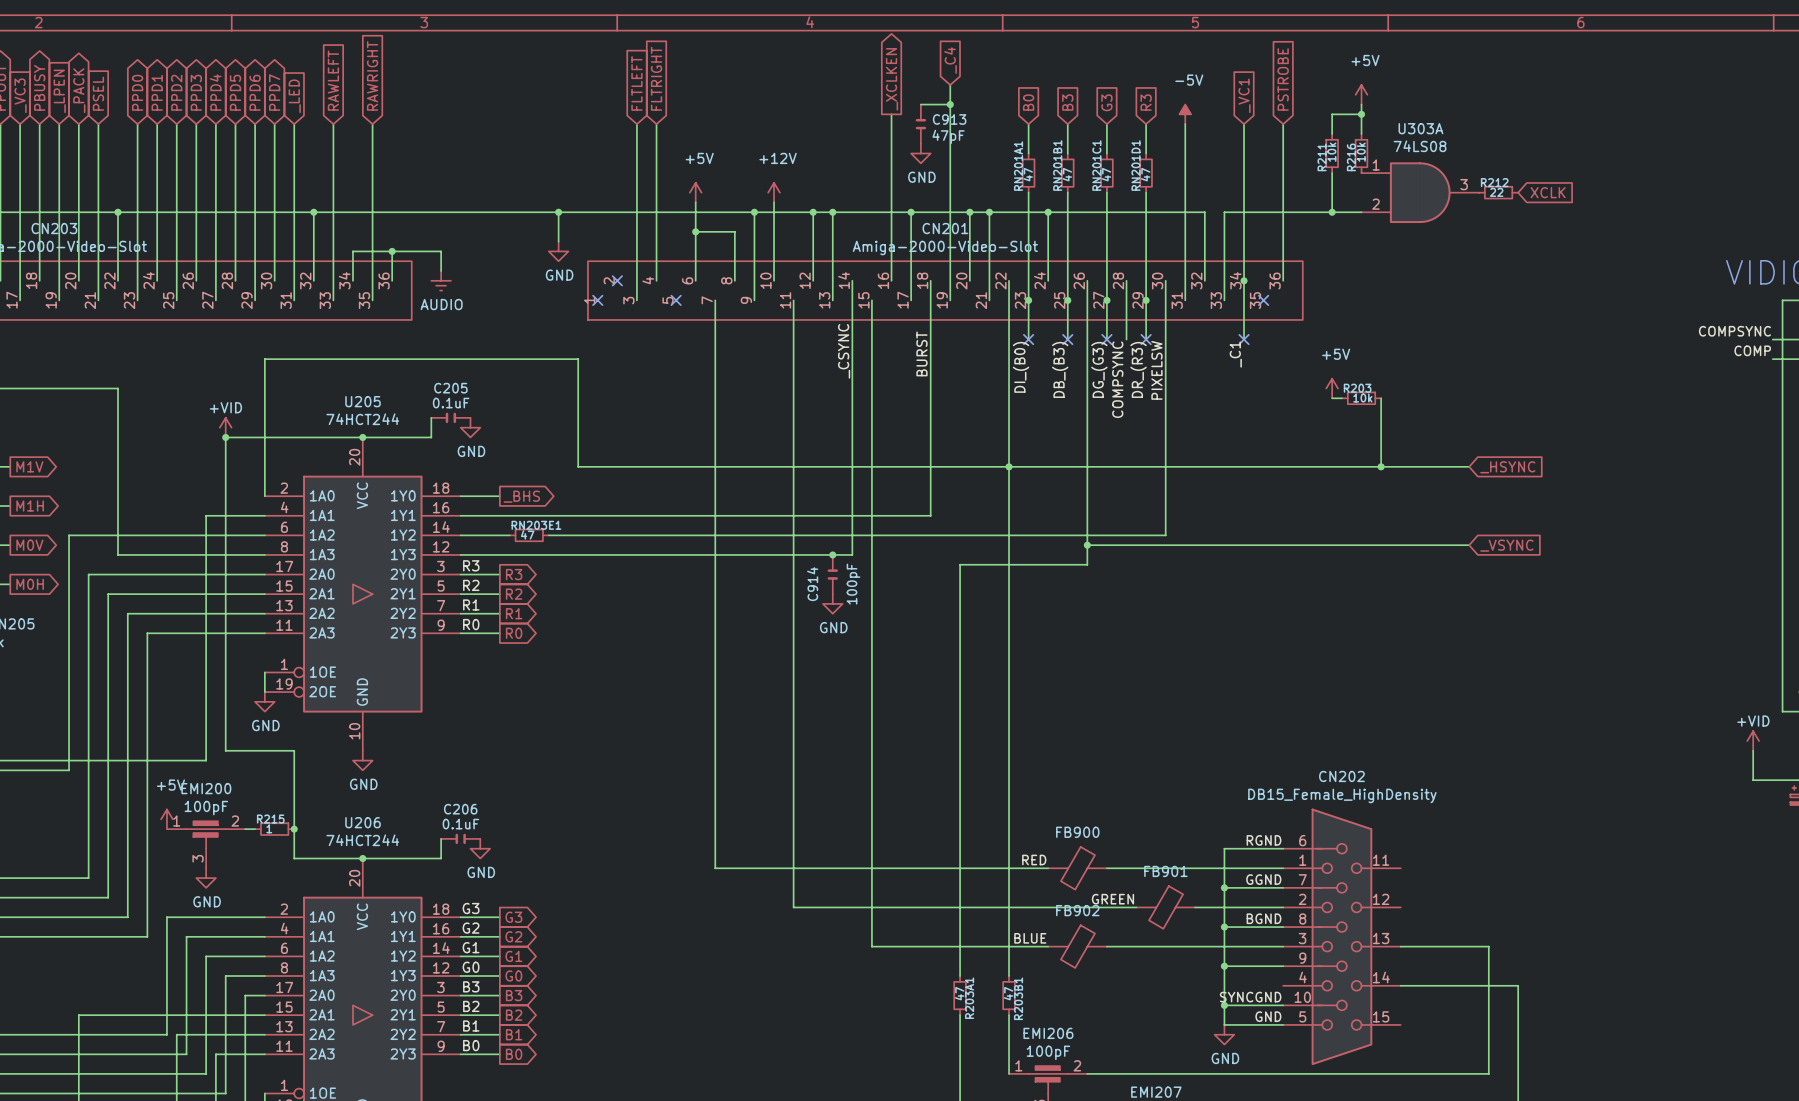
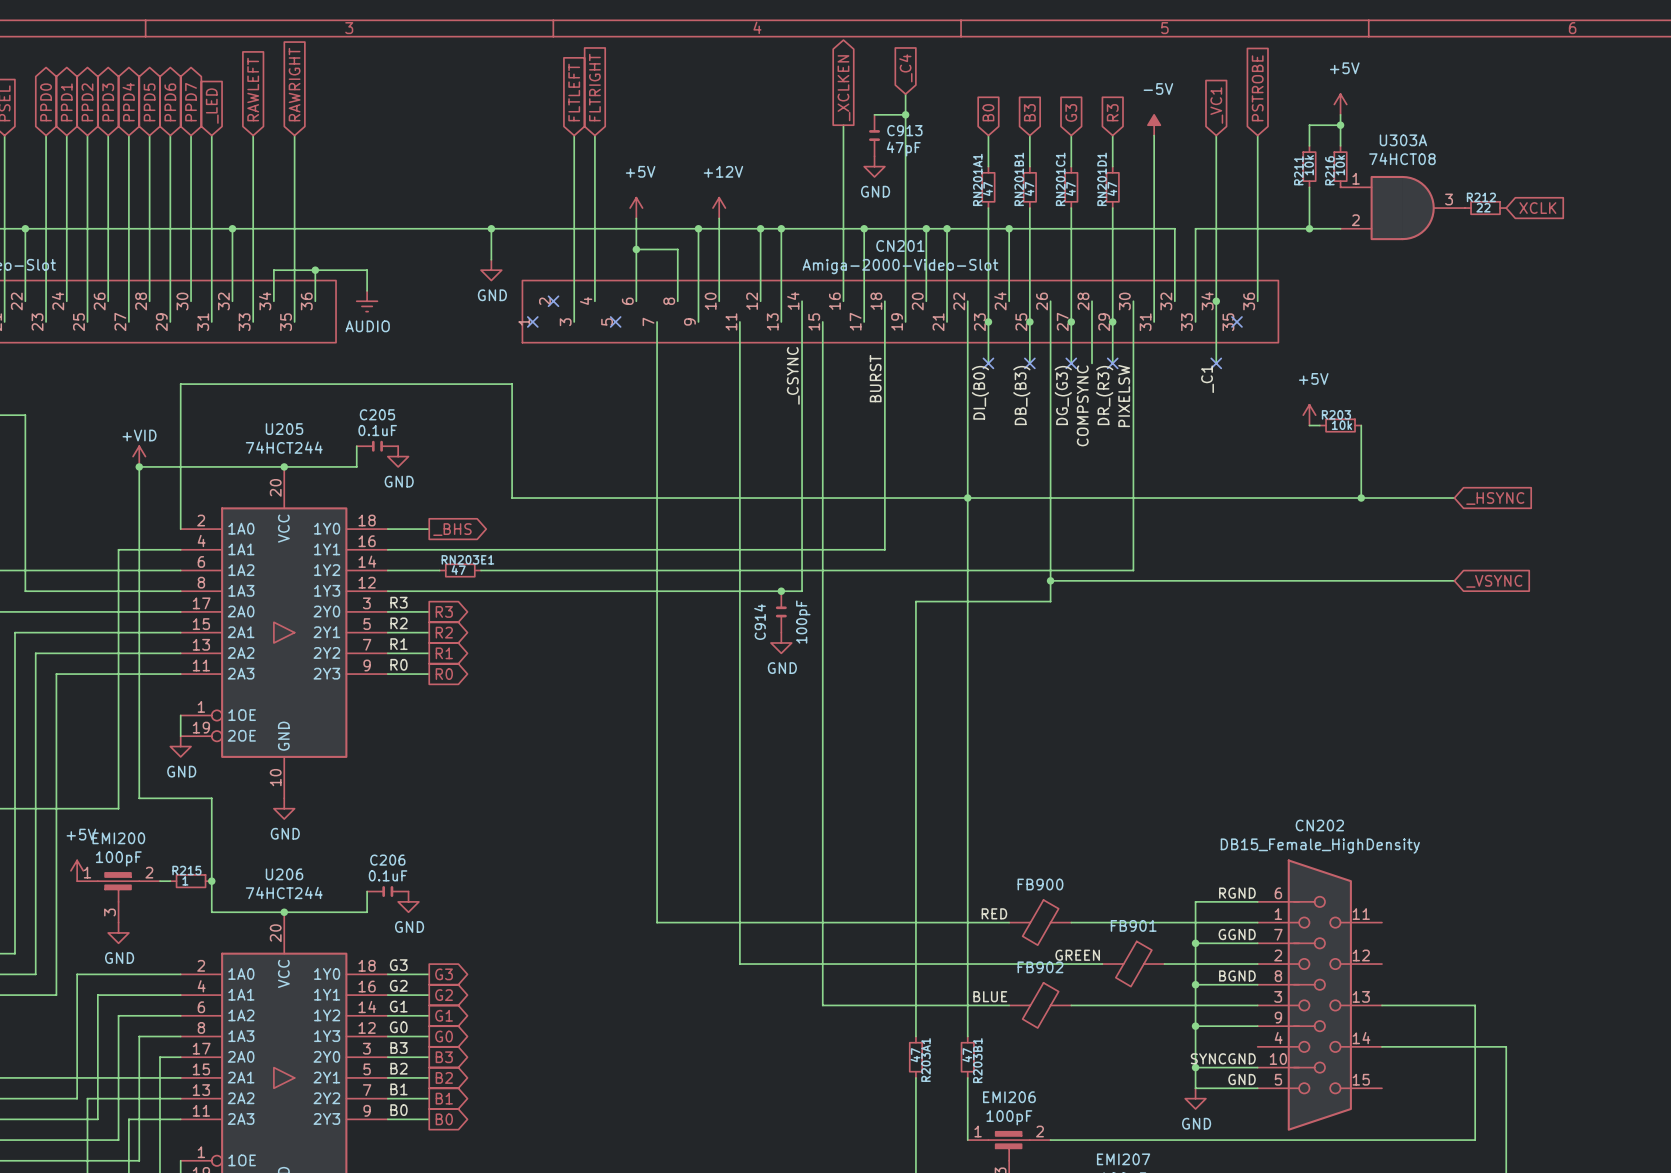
U303A value: 74LS08 (1420, 146) -> 74HCT08 (1402, 158)

